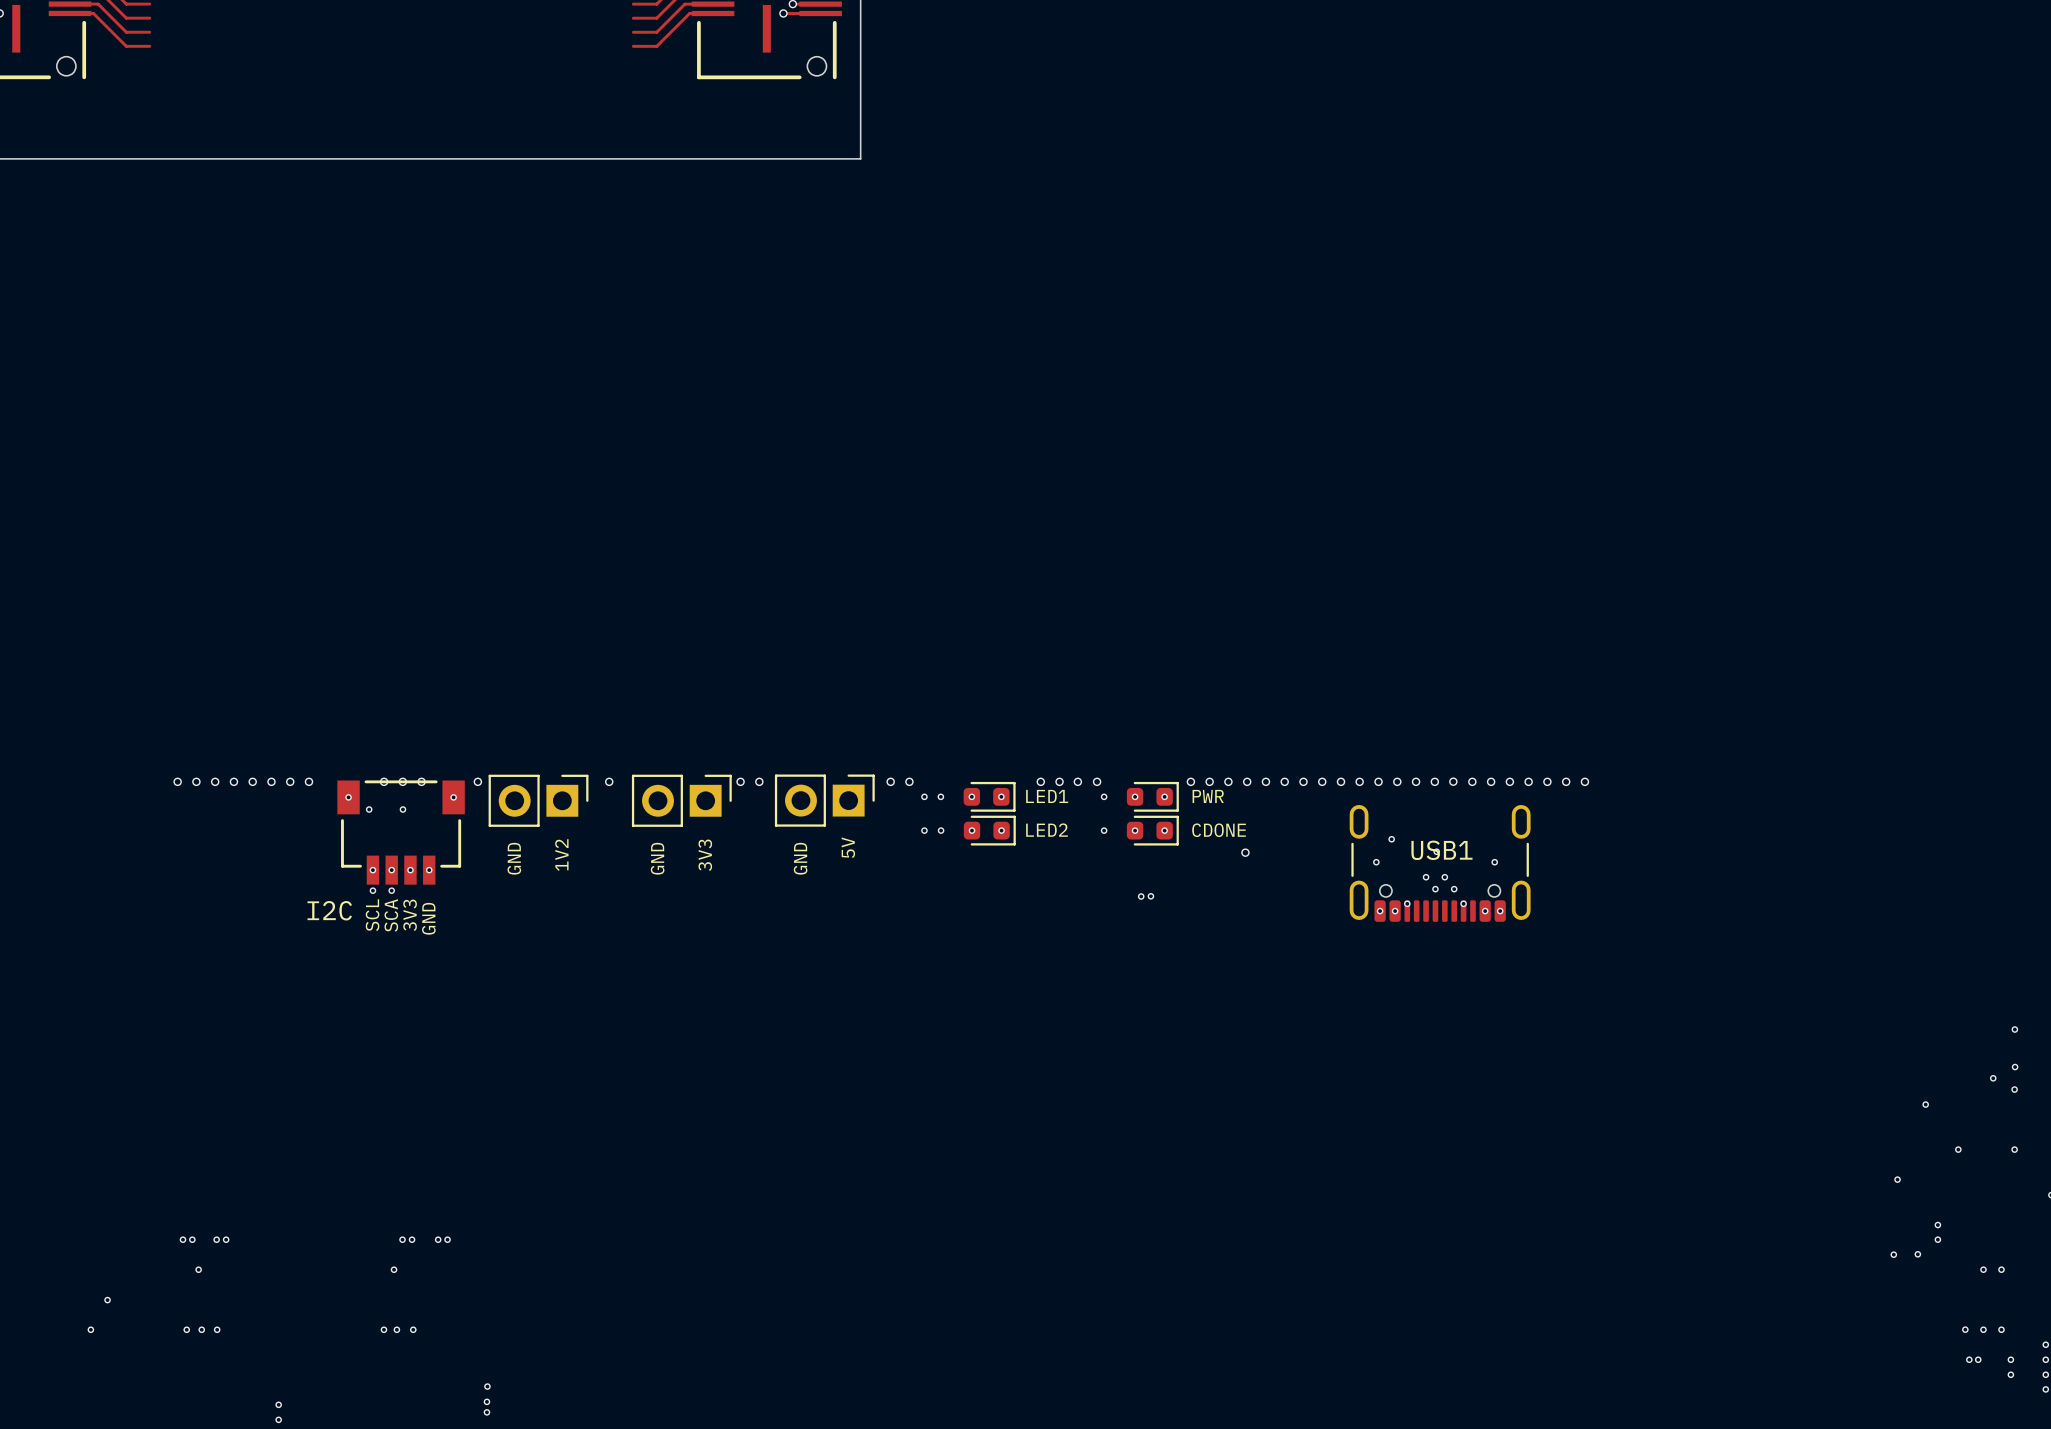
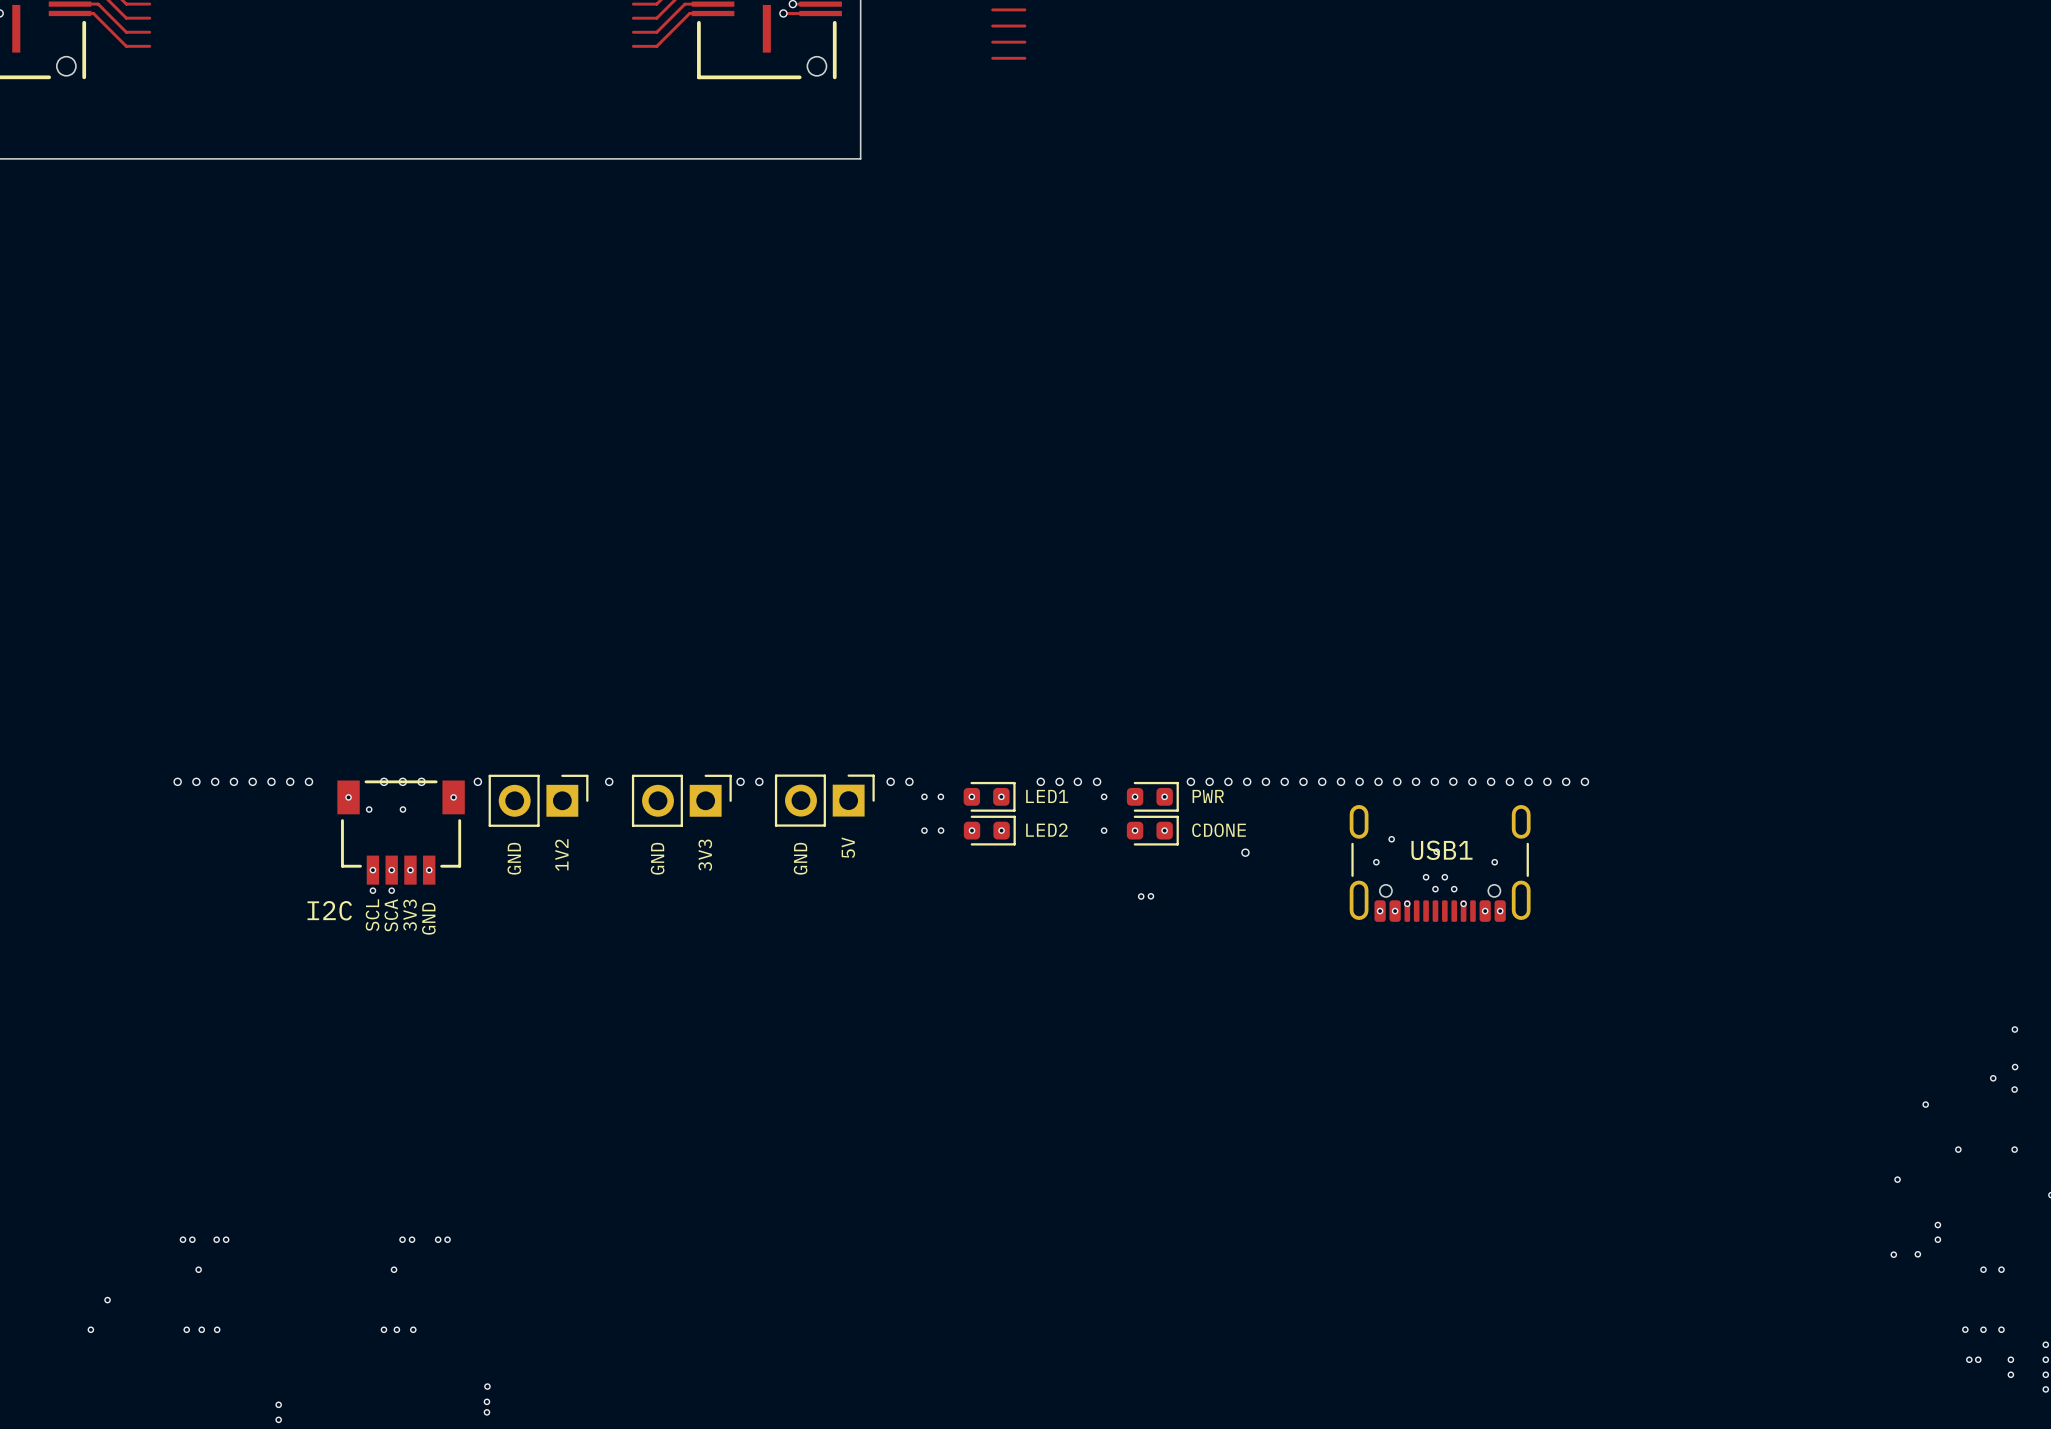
track: none -> (992, 9) (1024, 9)
track: none -> (992, 26) (1024, 26)
track: none -> (992, 42) (1024, 42)
track: none -> (992, 58) (1024, 58)

